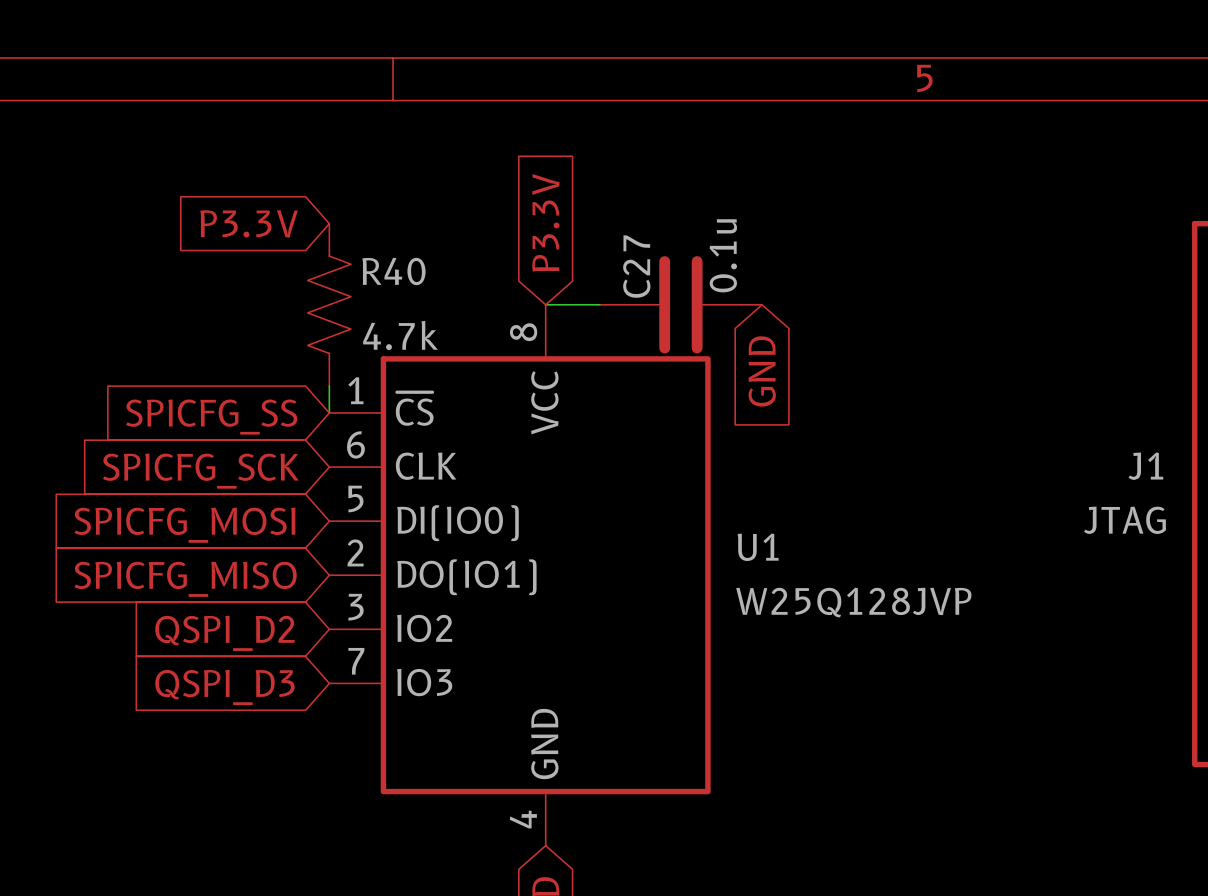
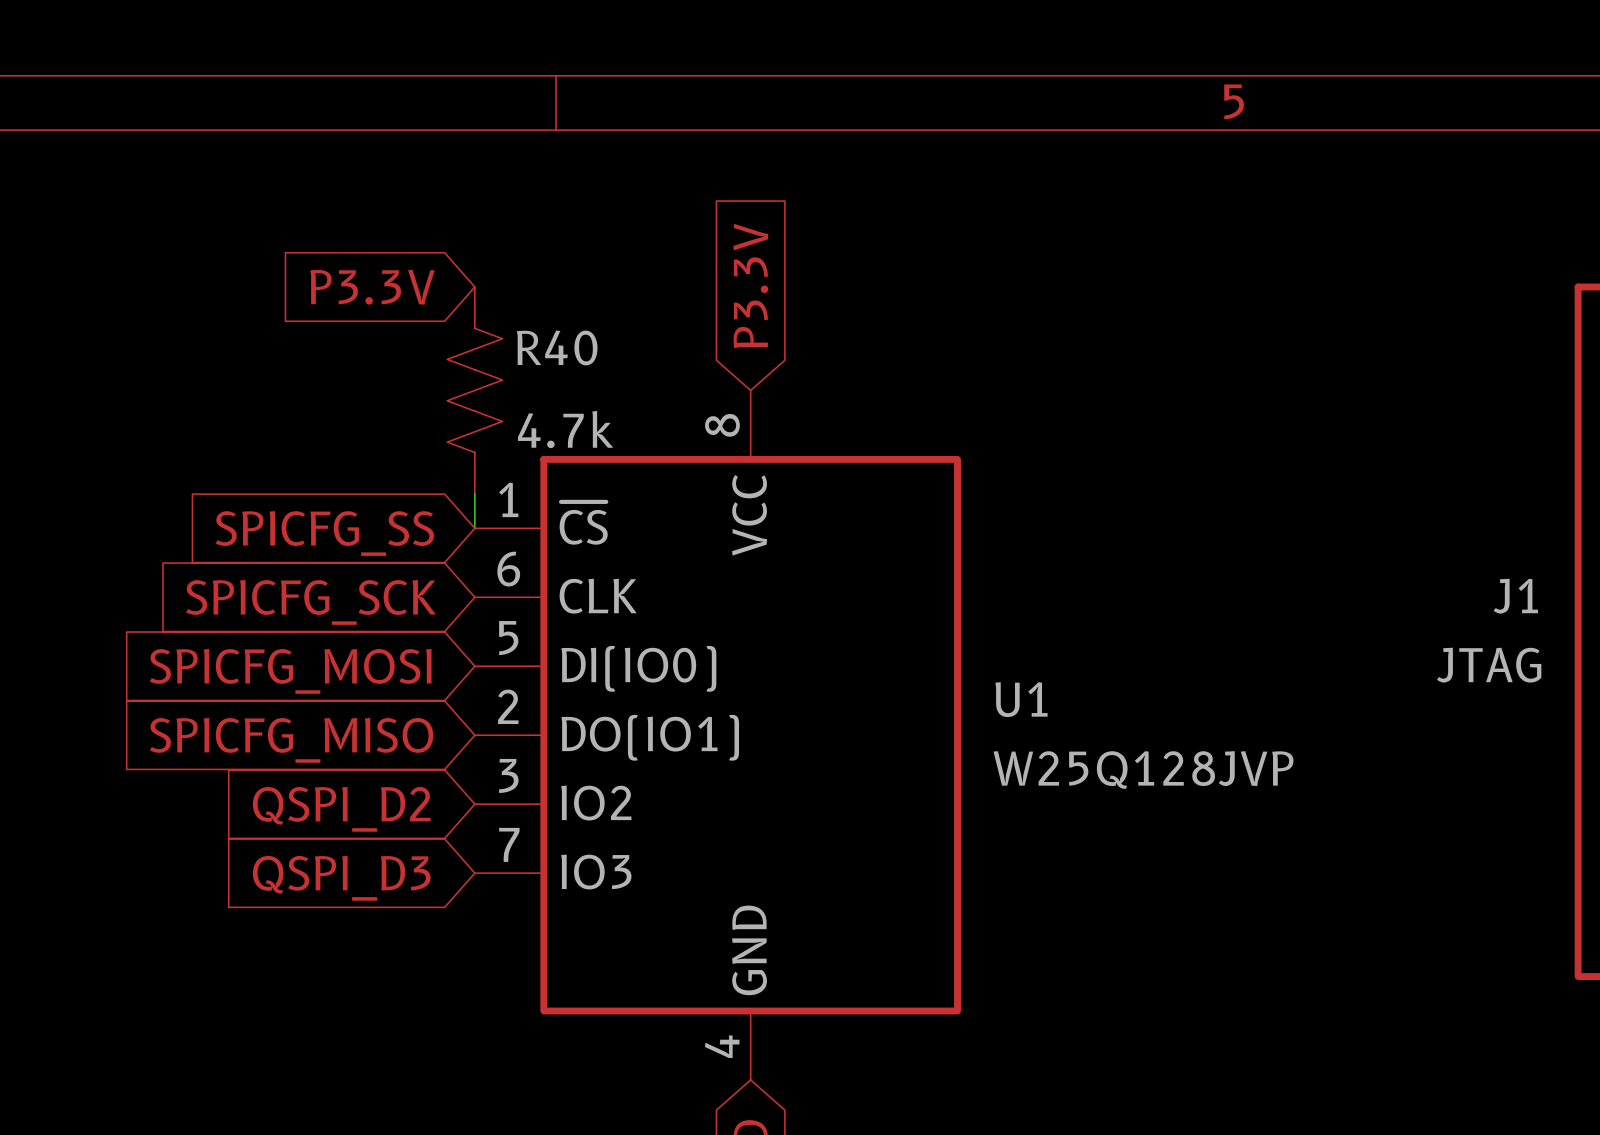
wire: (545, 304) (599, 304) -> none
C27: 0.1u (680, 304) -> none
global label: GND (762, 371) -> none

